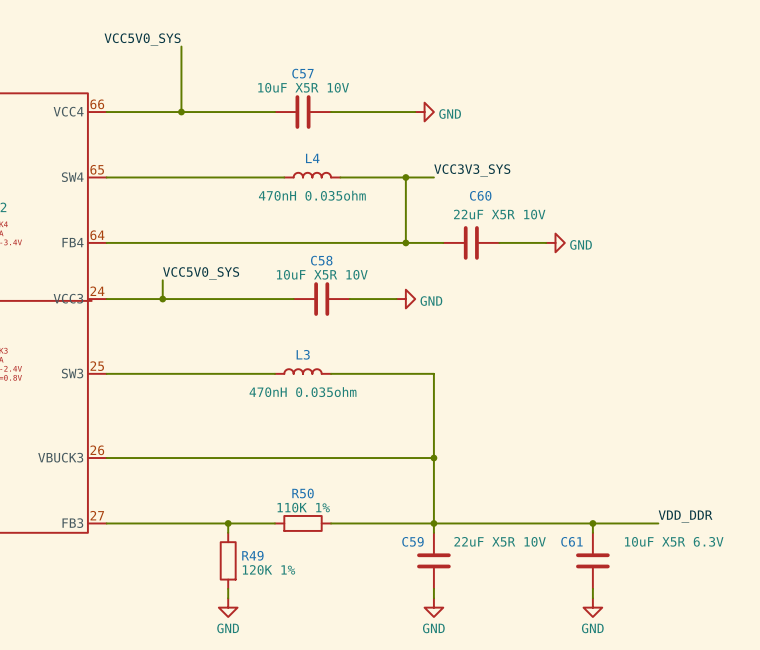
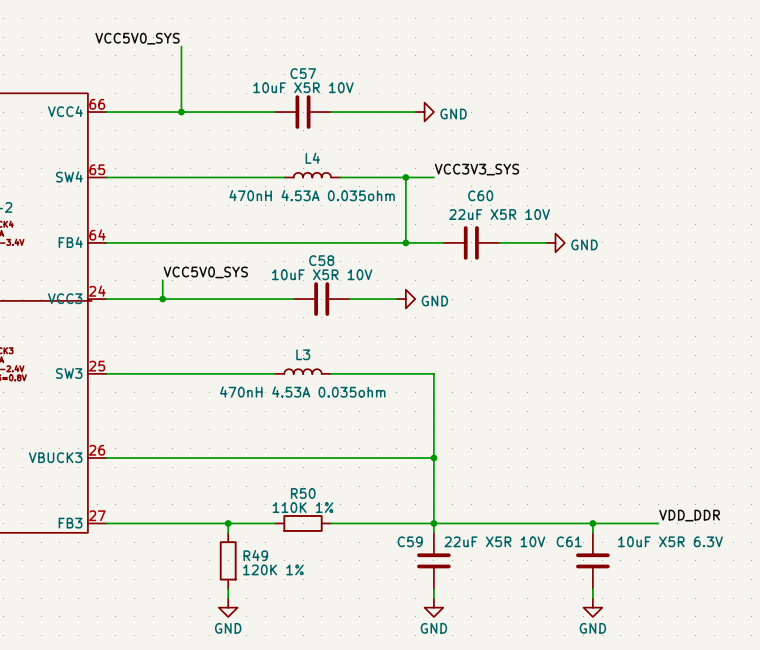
L4 value: 470nH 0.035ohm (312, 195) -> 470nH 4.53A 0.035ohm (312, 195)
L3 value: 470nH 0.035ohm (303, 392) -> 470nH 4.53A 0.035ohm (302, 391)

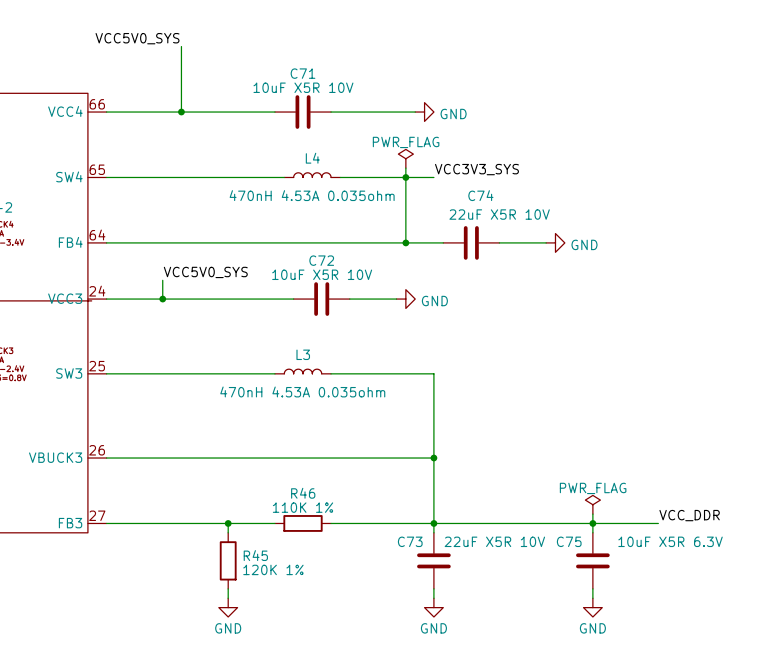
C57 name: C57 (303, 73) -> C71 (303, 73)
power symbol: none -> PWR_FLAG (405, 158)
wire: none -> (405, 168) (405, 177)
C60 name: C60 (480, 195) -> C74 (480, 195)
C58 name: C58 (321, 260) -> C72 (321, 260)
R50 name: R50 (303, 493) -> R46 (303, 493)
power symbol: none -> PWR_FLAG (592, 504)
wire: none -> (592, 514) (592, 523)
label: VDD_DDR (689, 515) -> VCC_DDR (689, 515)
C59 name: C59 (410, 541) -> C73 (410, 541)
C61 name: C61 (569, 541) -> C75 (569, 541)
R49 name: R49 (255, 555) -> R45 (255, 555)

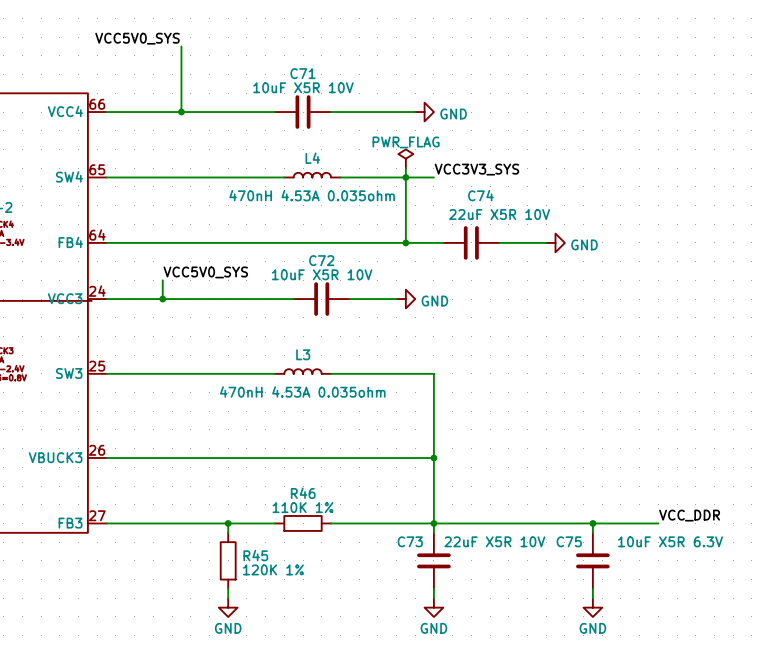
power symbol: PWR_FLAG (592, 504) -> none
wire: (592, 514) (592, 523) -> none

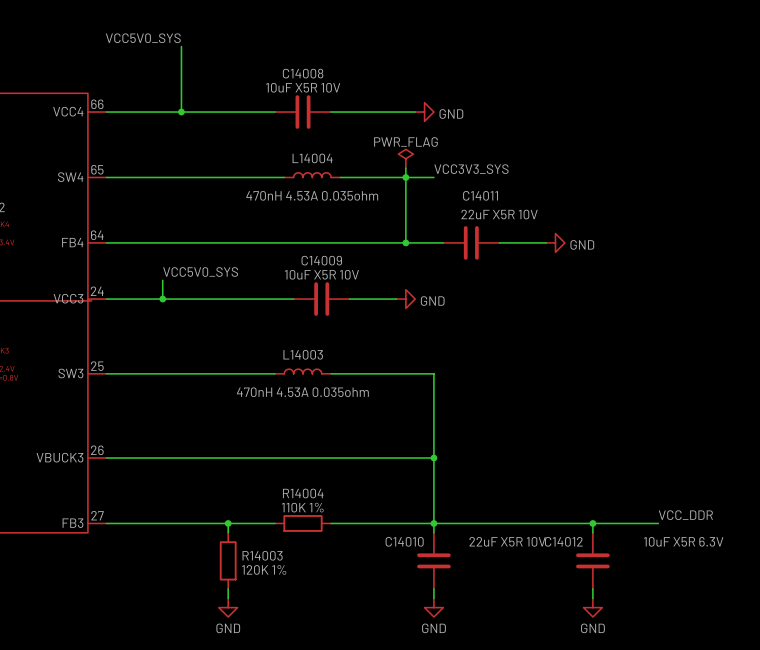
C71 name: C71 (303, 73) -> C14008 (303, 73)
L4 name: L4 (312, 158) -> L14004 (312, 158)
C74 name: C74 (480, 195) -> C14011 (480, 195)
C72 name: C72 (321, 260) -> C14009 (321, 260)
L3 name: L3 (303, 354) -> L14003 (303, 354)
R46 name: R46 (303, 493) -> R14004 (303, 493)
C73 name: C73 (410, 541) -> C14010 (404, 541)
C75 name: C75 (569, 541) -> C14012 (563, 541)
R45 name: R45 (255, 555) -> R14003 (262, 555)

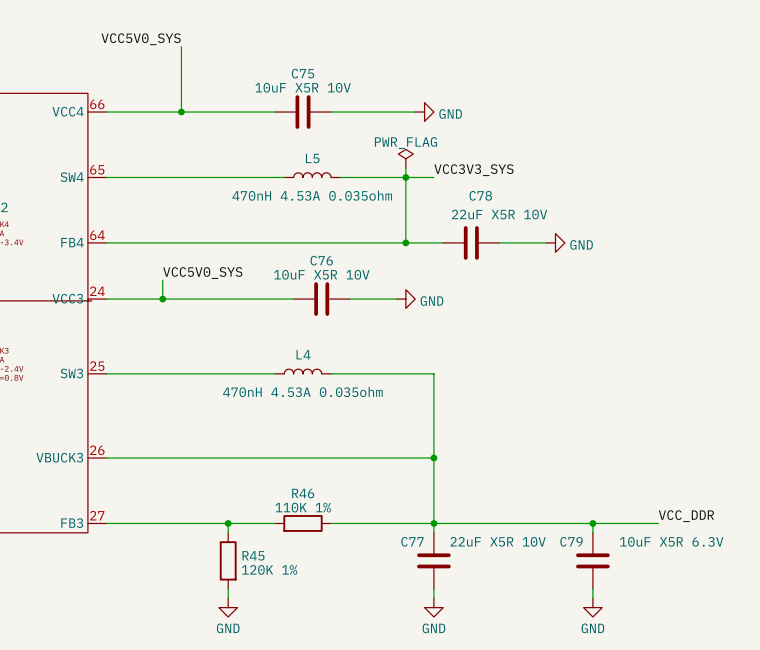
C14008 name: C14008 (303, 73) -> C75 (303, 73)
L14004 name: L14004 (312, 158) -> L5 (312, 158)
C14011 name: C14011 (480, 195) -> C78 (480, 195)
C14009 name: C14009 (321, 260) -> C76 (321, 260)
L14003 name: L14003 (303, 354) -> L4 (303, 354)
R14004 name: R14004 (303, 493) -> R46 (303, 493)
C14010 name: C14010 (404, 541) -> C77 (412, 541)
C14012 name: C14012 (563, 541) -> C79 (571, 541)
R14003 name: R14003 (262, 555) -> R45 (253, 555)

